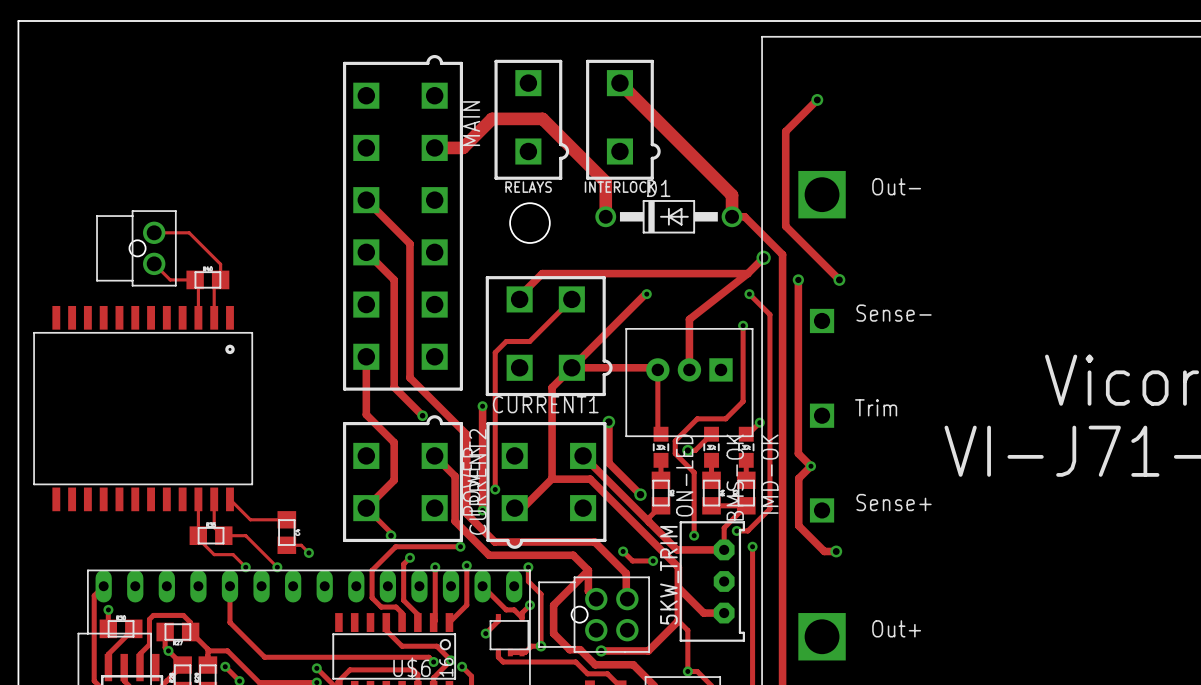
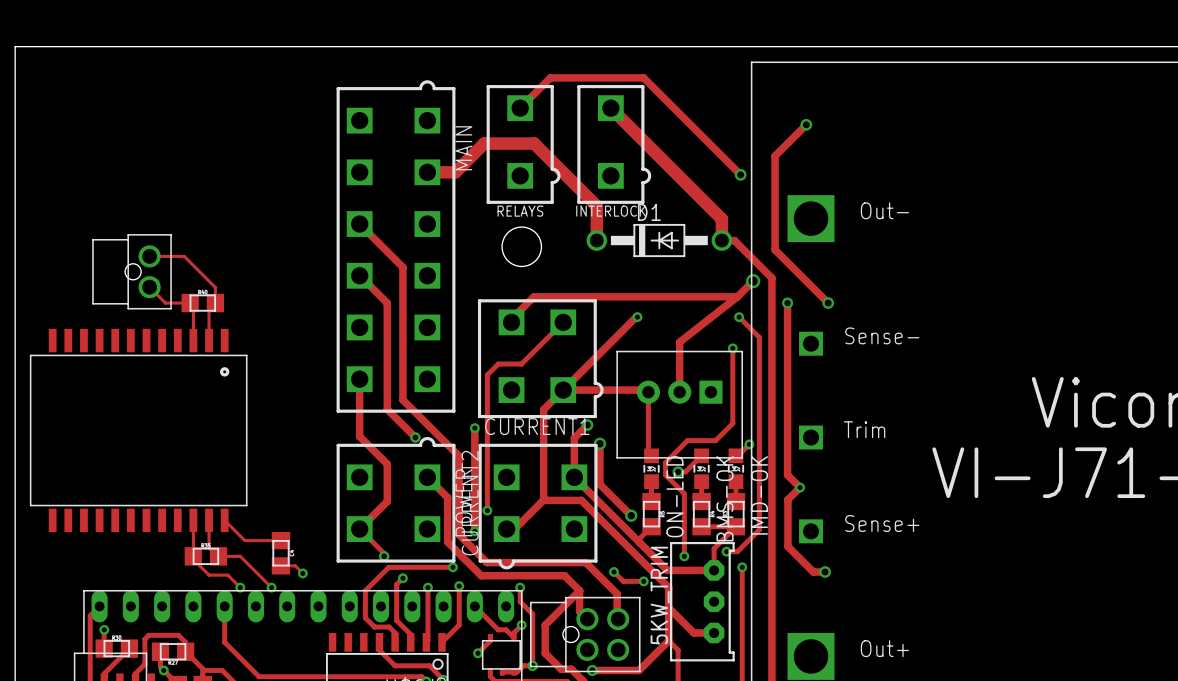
track: none -> (520, 108) (550, 77) (643, 77) (740, 174)
via: none -> (740, 174)
track: none -> (587, 425) (574, 438) (574, 477)
via: none -> (587, 425)

